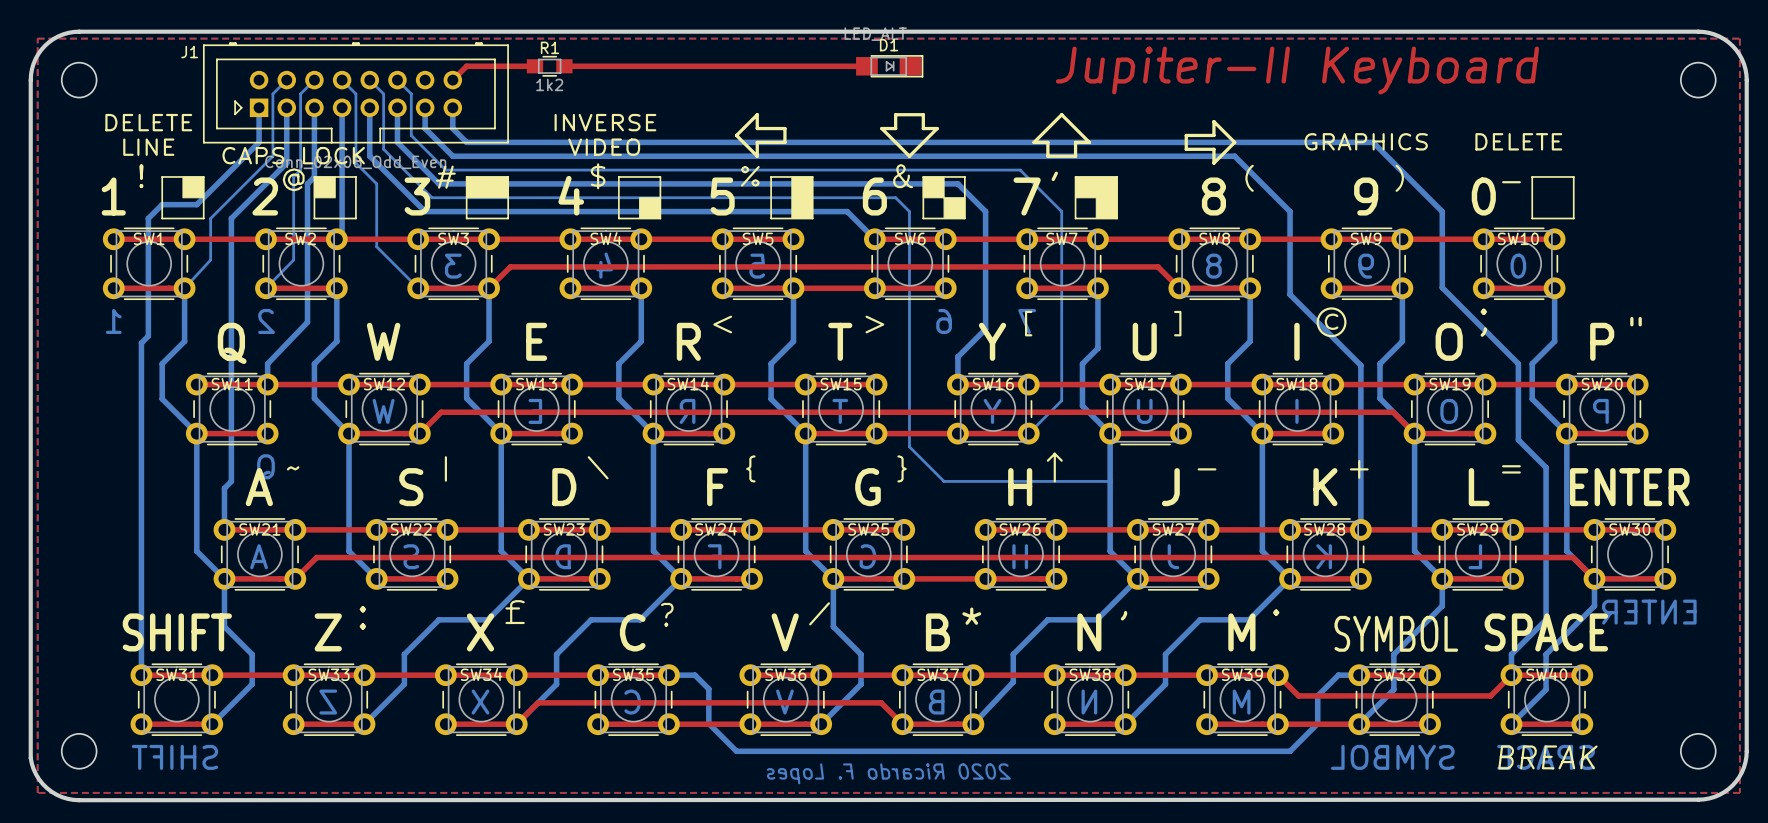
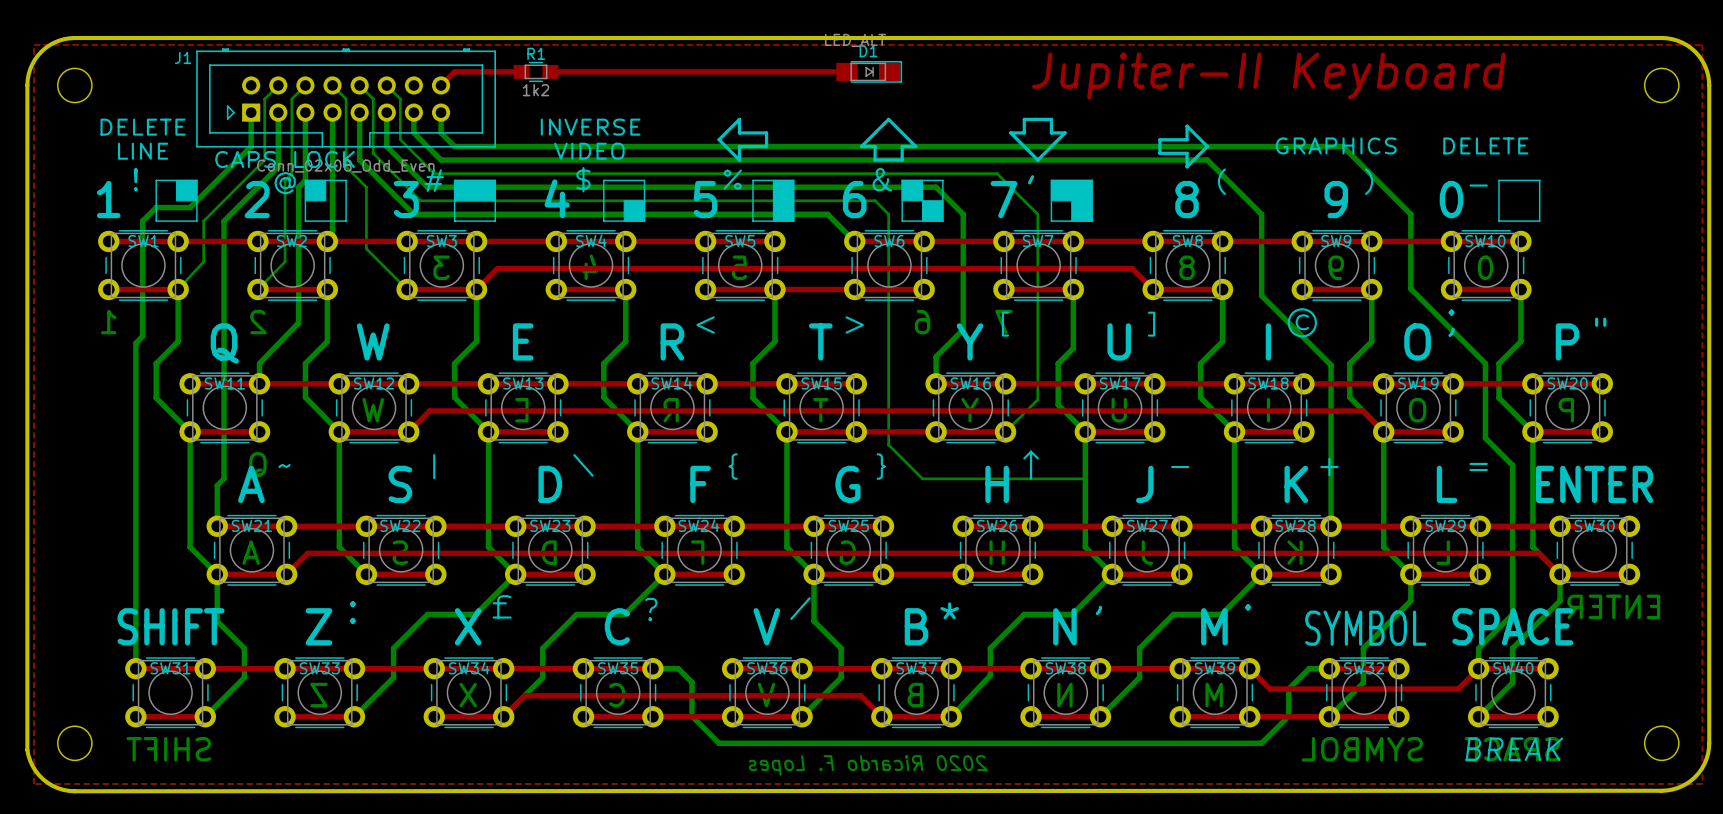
line: (895, 114) (895, 128) (881, 128) (909, 156) (937, 128) (923, 128) (923, 114) (895, 114) -> (1024, 119) (1024, 132) (1010, 132) (1037, 160) (1064, 132) (1051, 132) (1051, 119) (1024, 119)
line: (1061, 114) (1089, 142) (1075, 142) (1075, 156) (1047, 156) (1047, 142) (1034, 142) (1061, 114) -> (888, 119) (915, 146) (902, 146) (902, 160) (875, 160) (875, 146) (861, 146) (888, 119)

